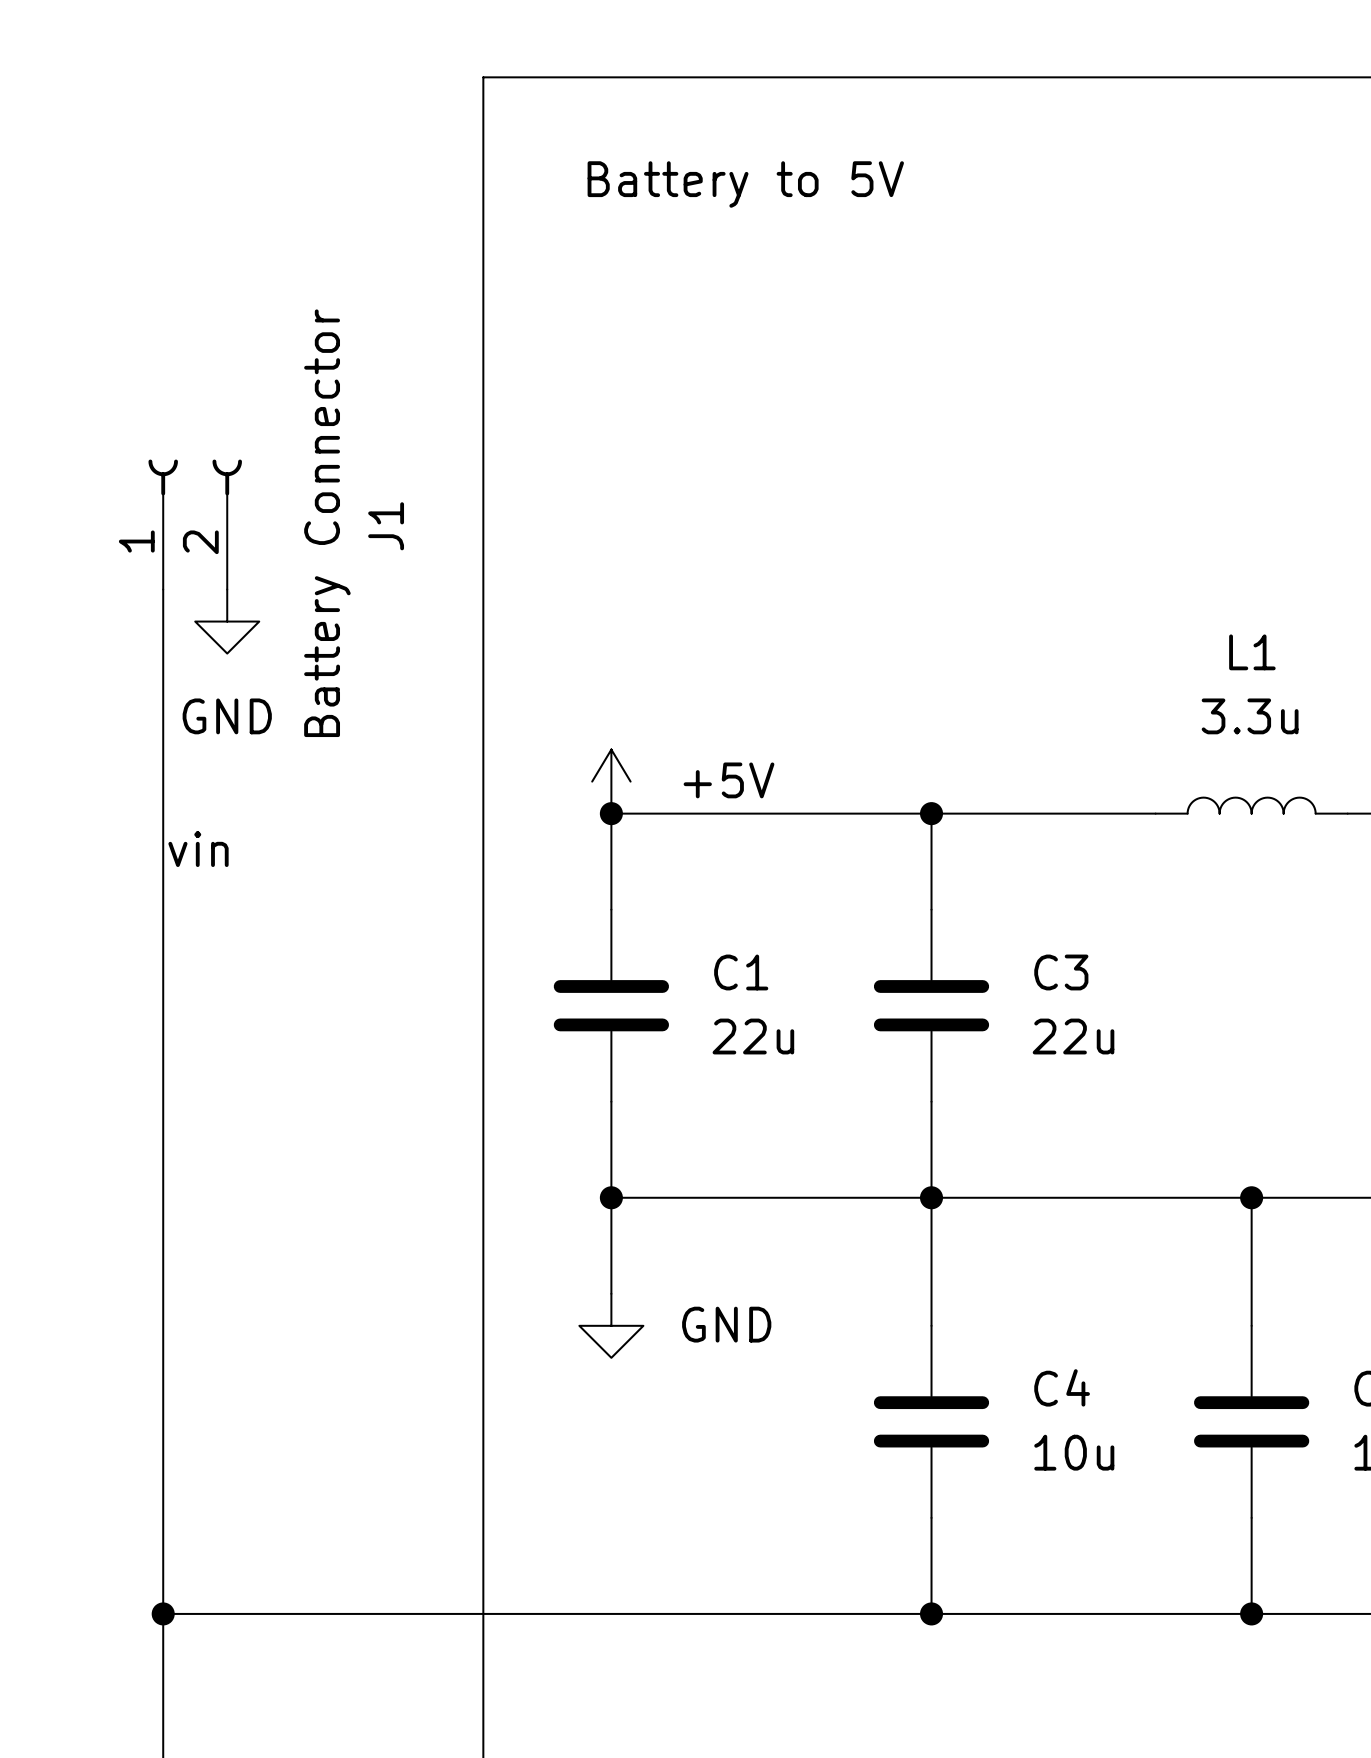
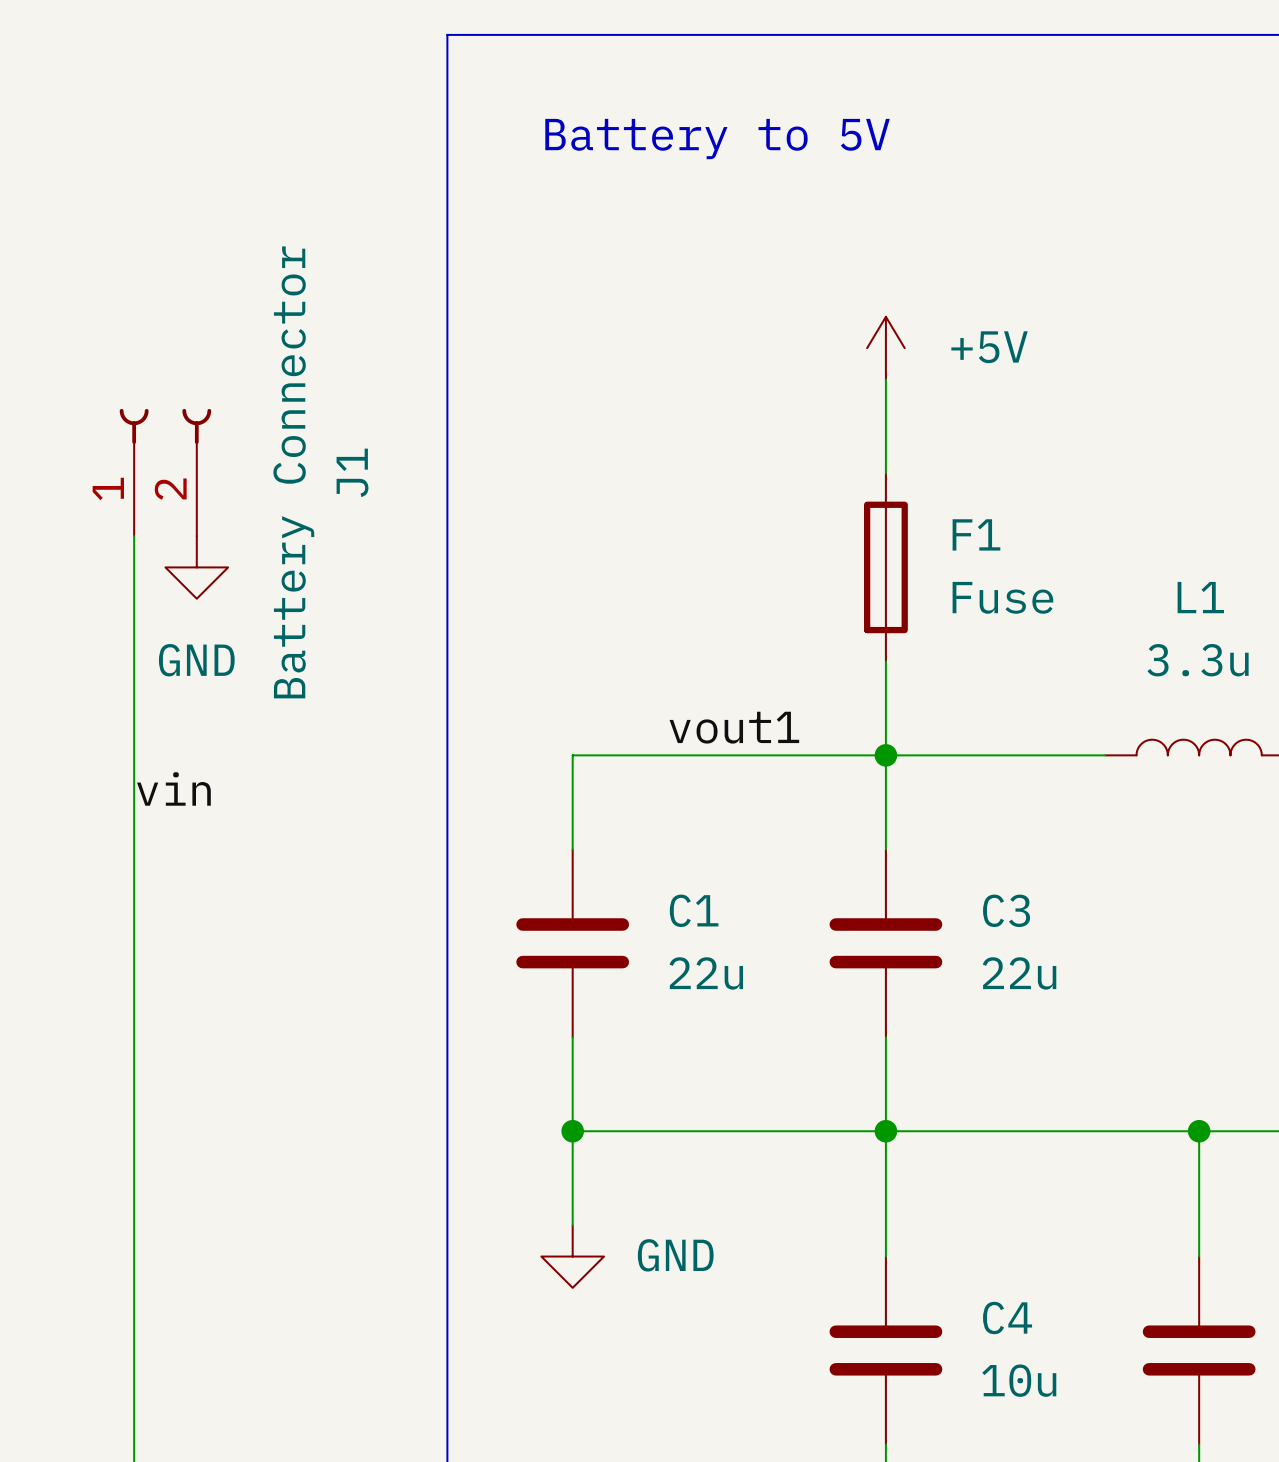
wire: none -> (885, 379) (885, 473)
F1: none -> Fuse (885, 567)
wire: none -> (885, 661) (885, 755)
power symbol position: +5V (611, 781) -> +5V (885, 348)
label: none -> vout1 (734, 727)
junction: (611, 813) -> none

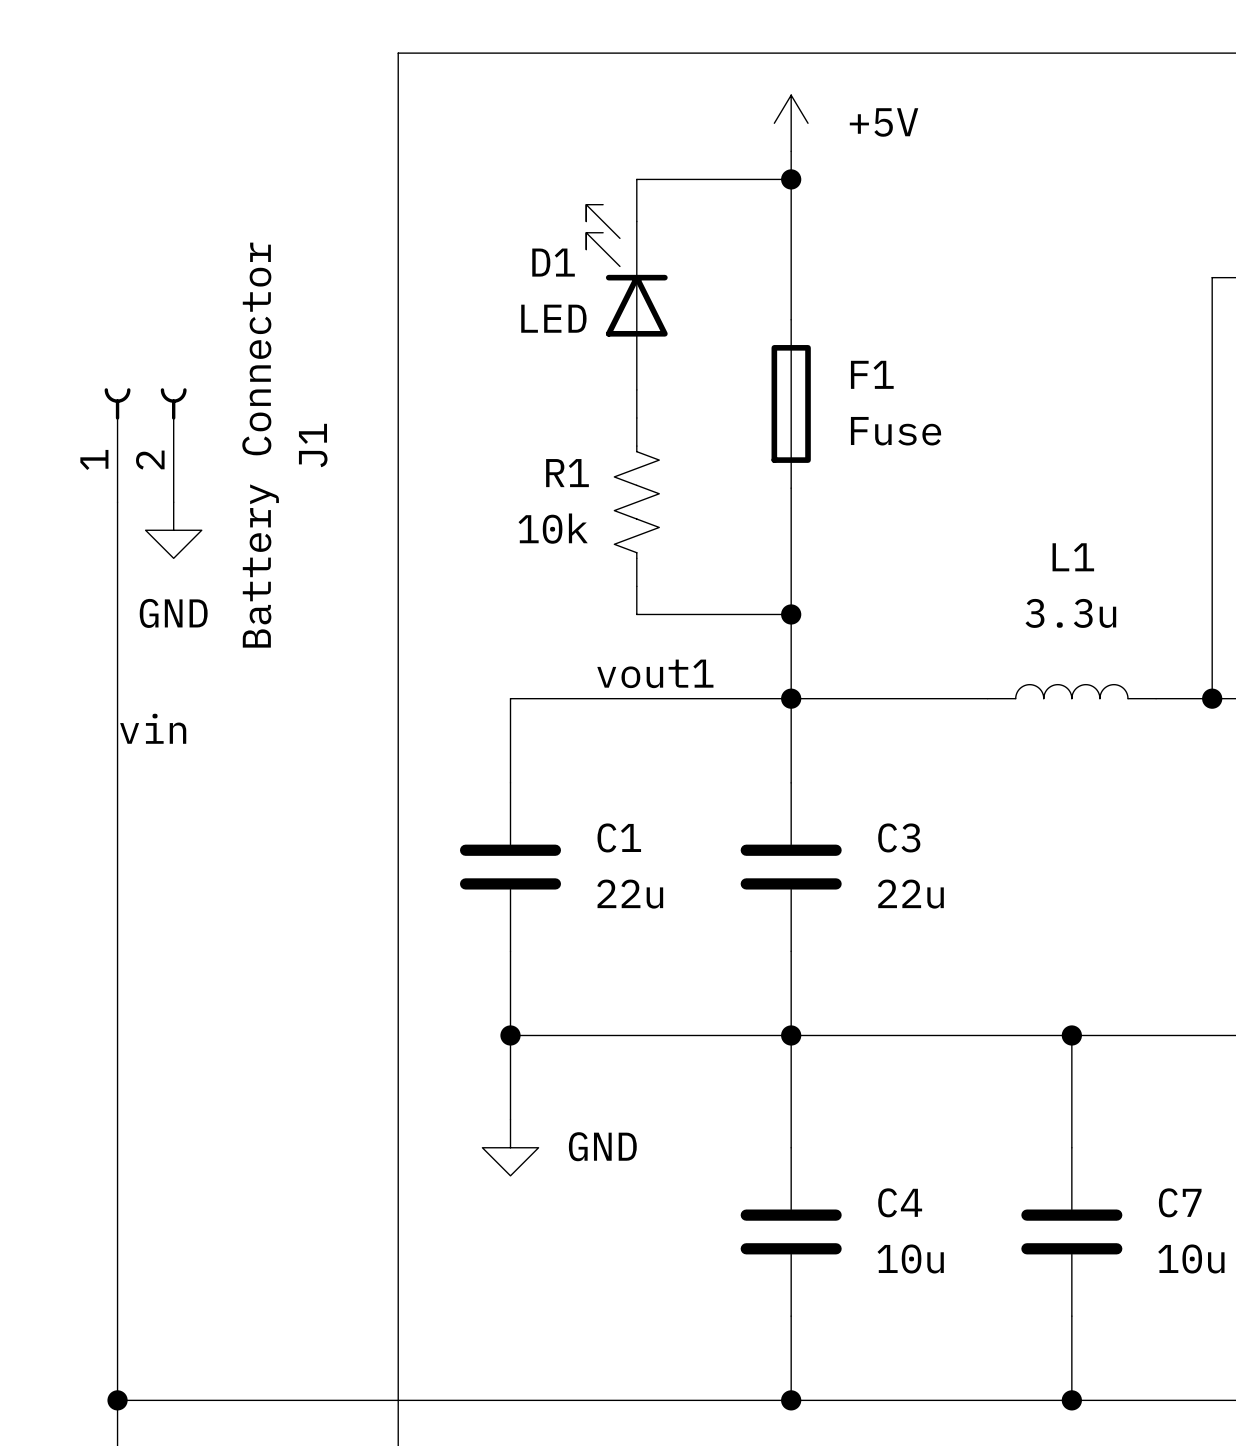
text: Battery to 5V (717, 139) -> none
wire: none -> (791, 151) (791, 319)
wire: none -> (791, 179) (636, 179) (636, 221)
junction: none -> (791, 179)
D1: none -> LED (626, 297)
power symbol position: +5V (885, 348) -> +5V (791, 123)
wire: none -> (636, 389) (636, 417)
wire: none -> (791, 488) (791, 614) (636, 614) (636, 586)
R1: none -> 10k (636, 502)
F1 position: (885, 567) -> (791, 403)
junction: none -> (791, 614)

